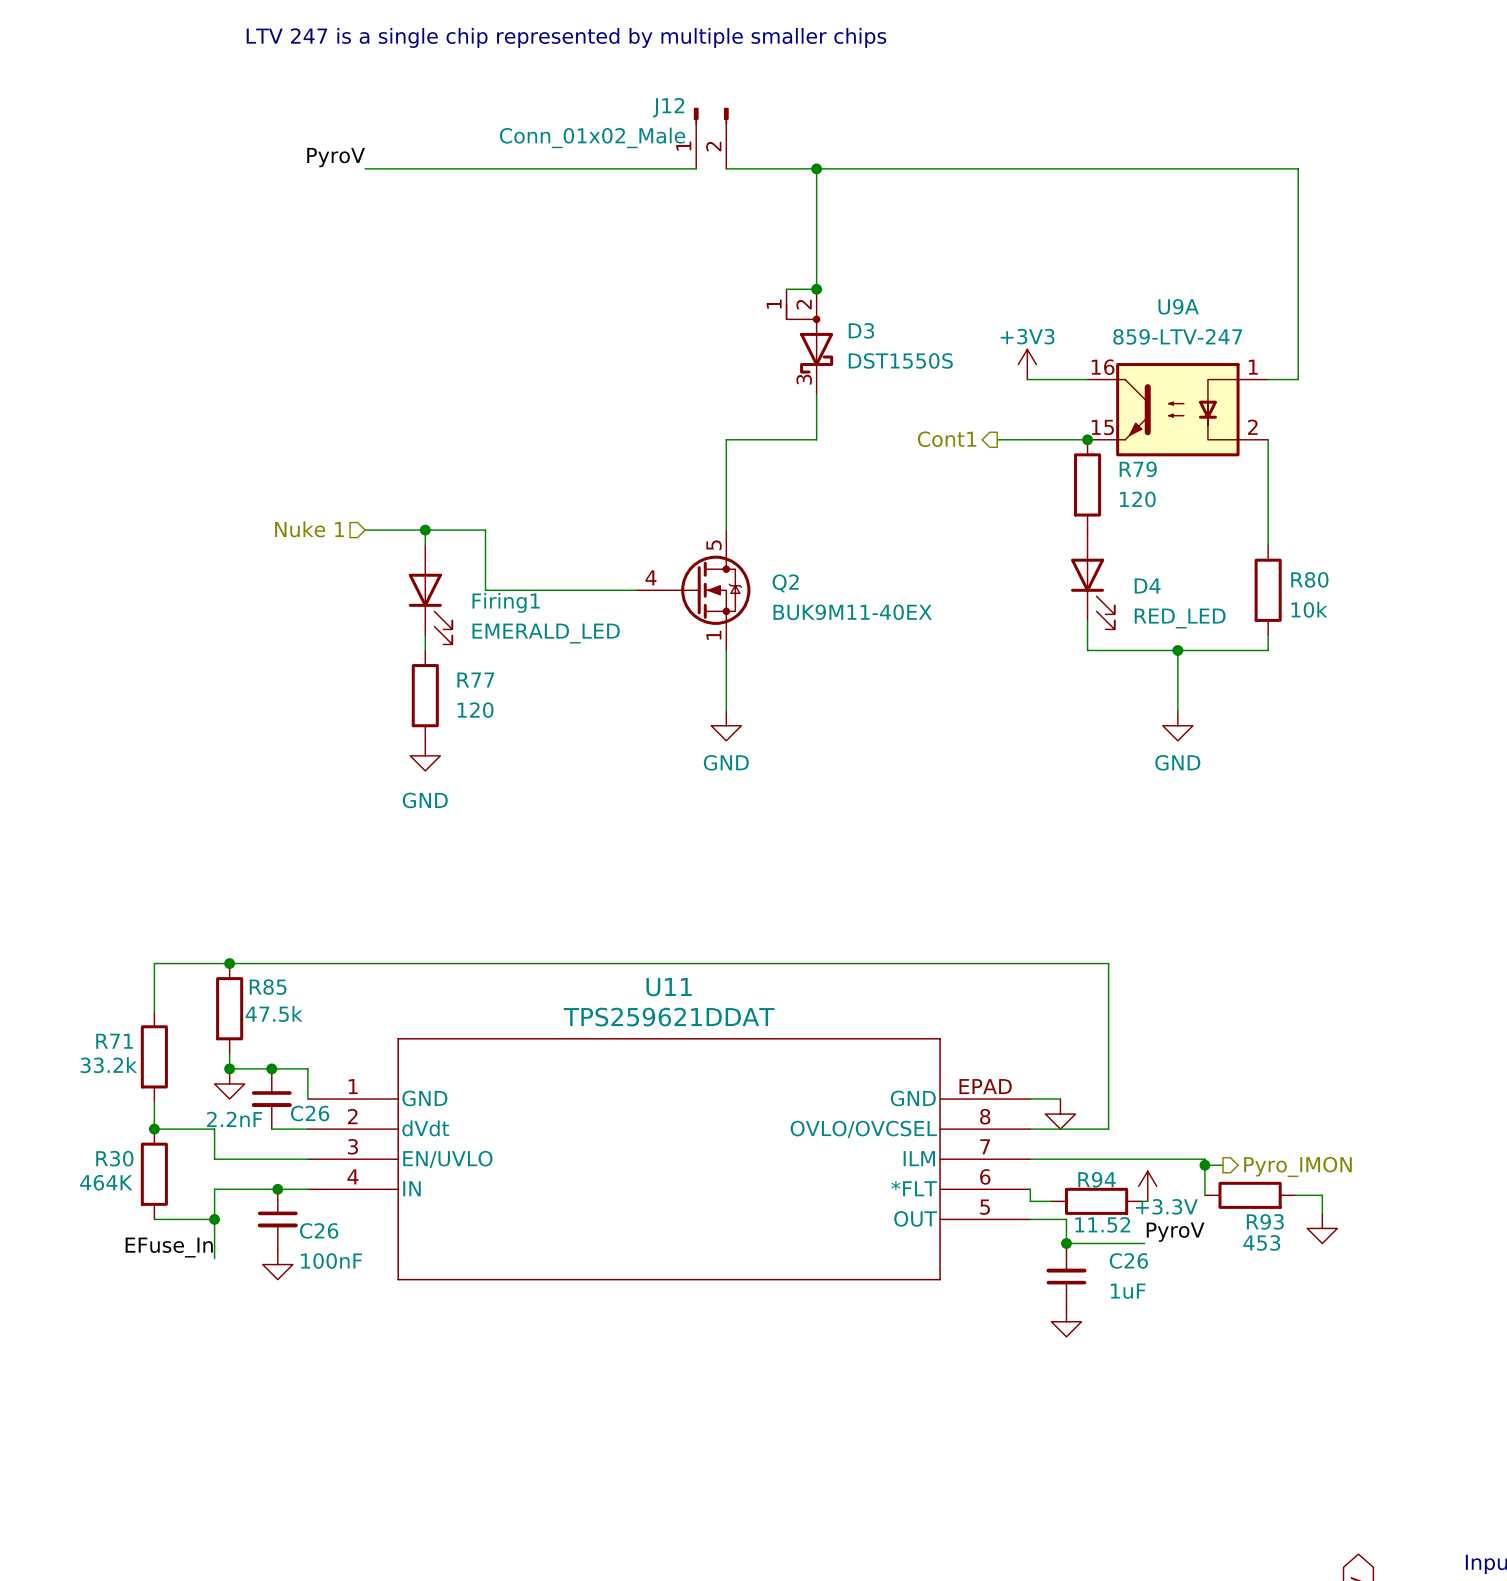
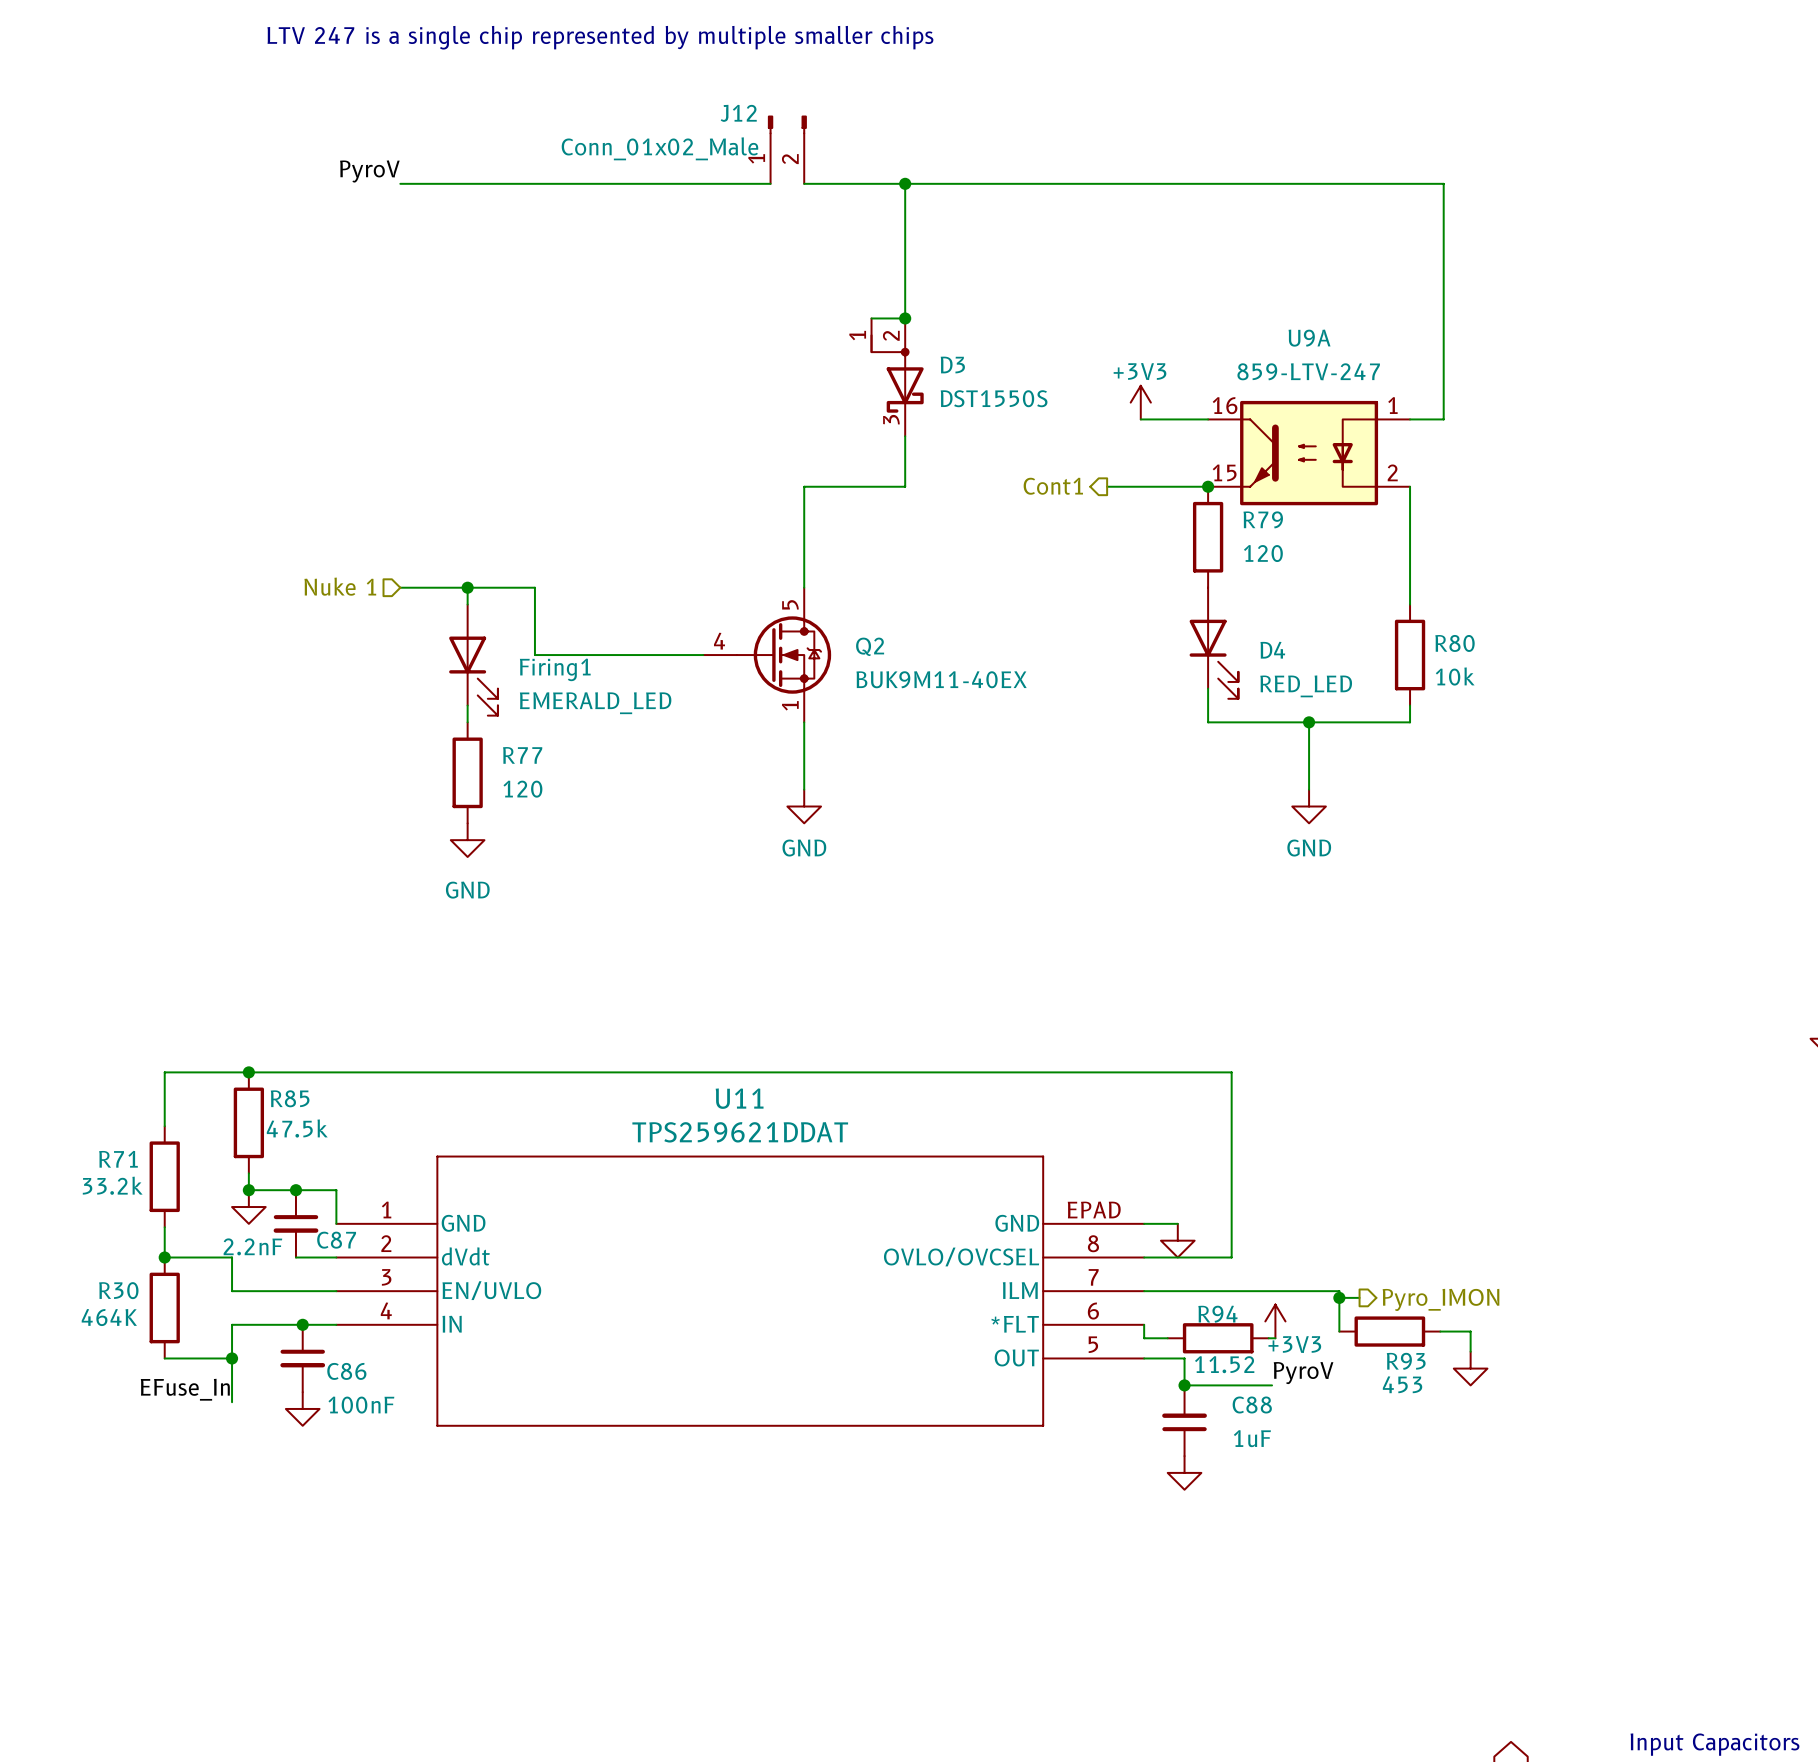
C26 name: C26 (310, 1113) -> C87 (336, 1240)
power symbol: +3.3V (1147, 1186) -> +3V3 (1275, 1321)
C26 name: C26 (319, 1230) -> C86 (346, 1371)
C26 name: C26 (1128, 1260) -> C88 (1252, 1404)

